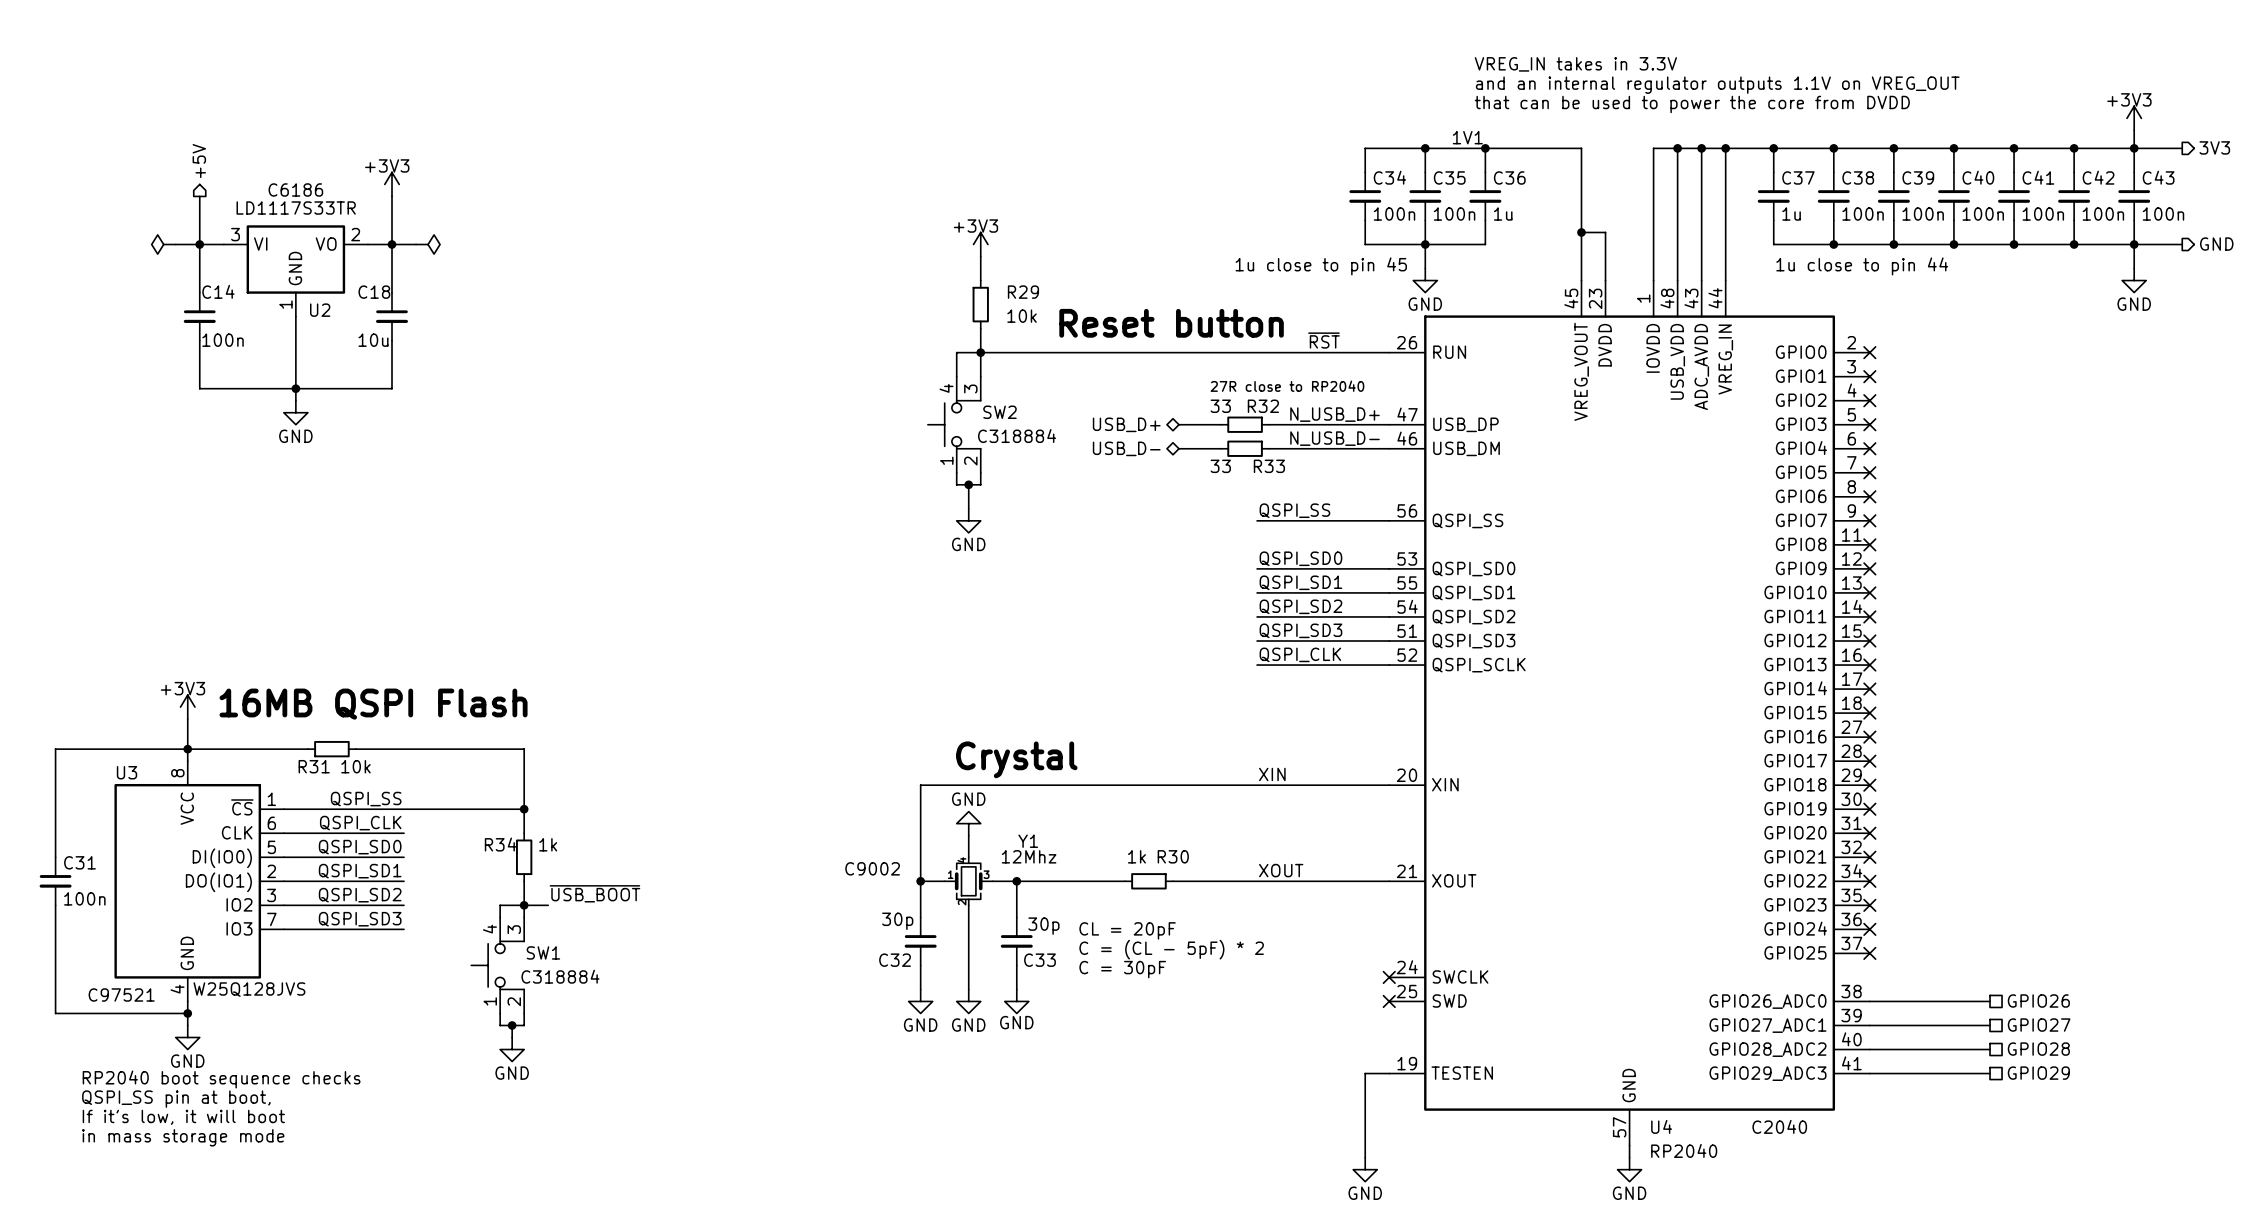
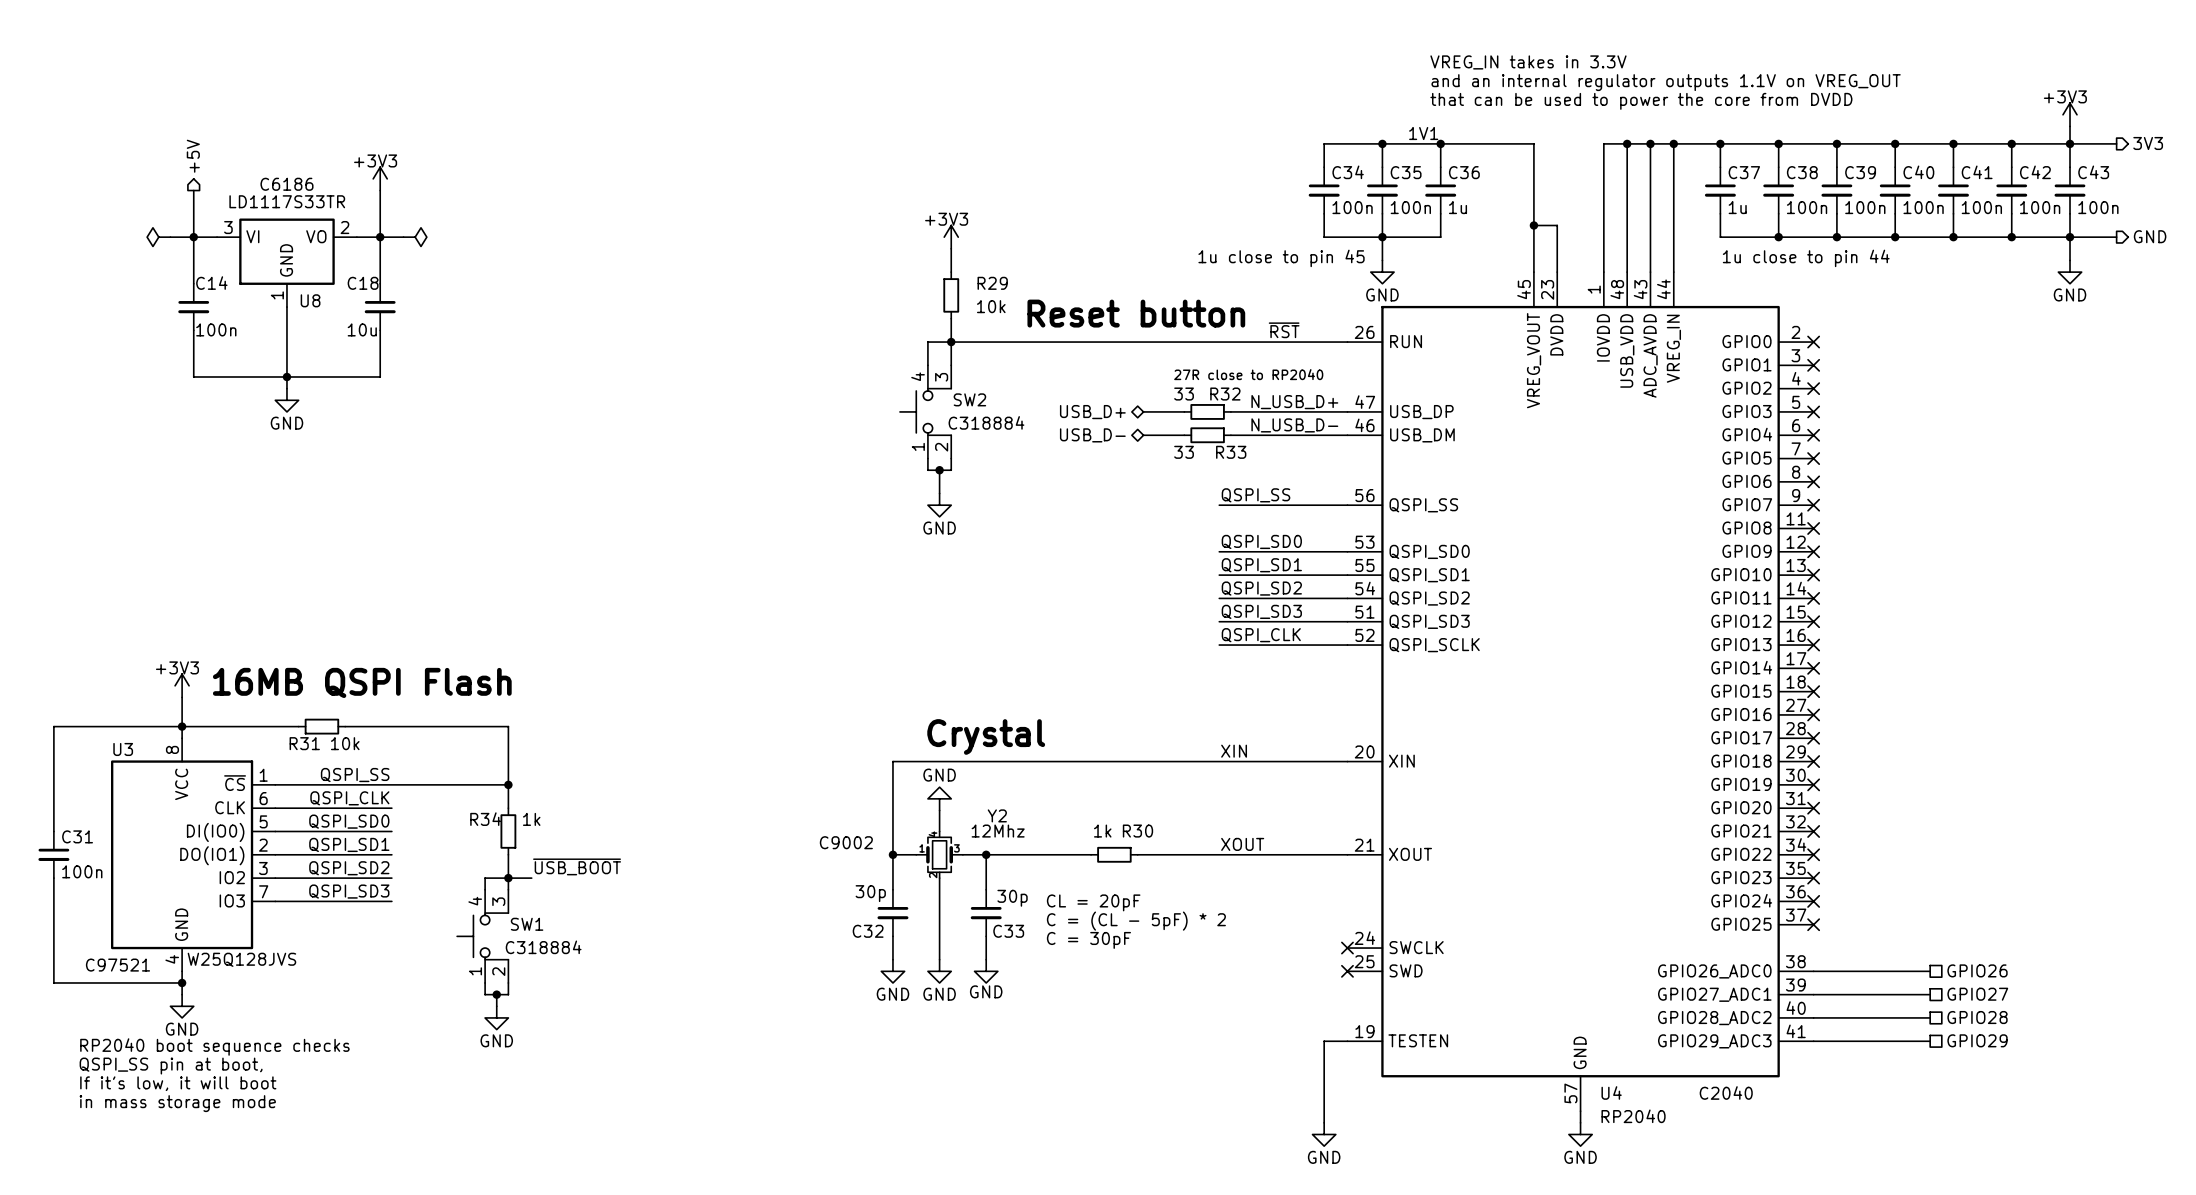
U2 name: U2 (320, 310) -> U8 (310, 300)
Y1 name: Y1 (1028, 841) -> Y2 (997, 815)

